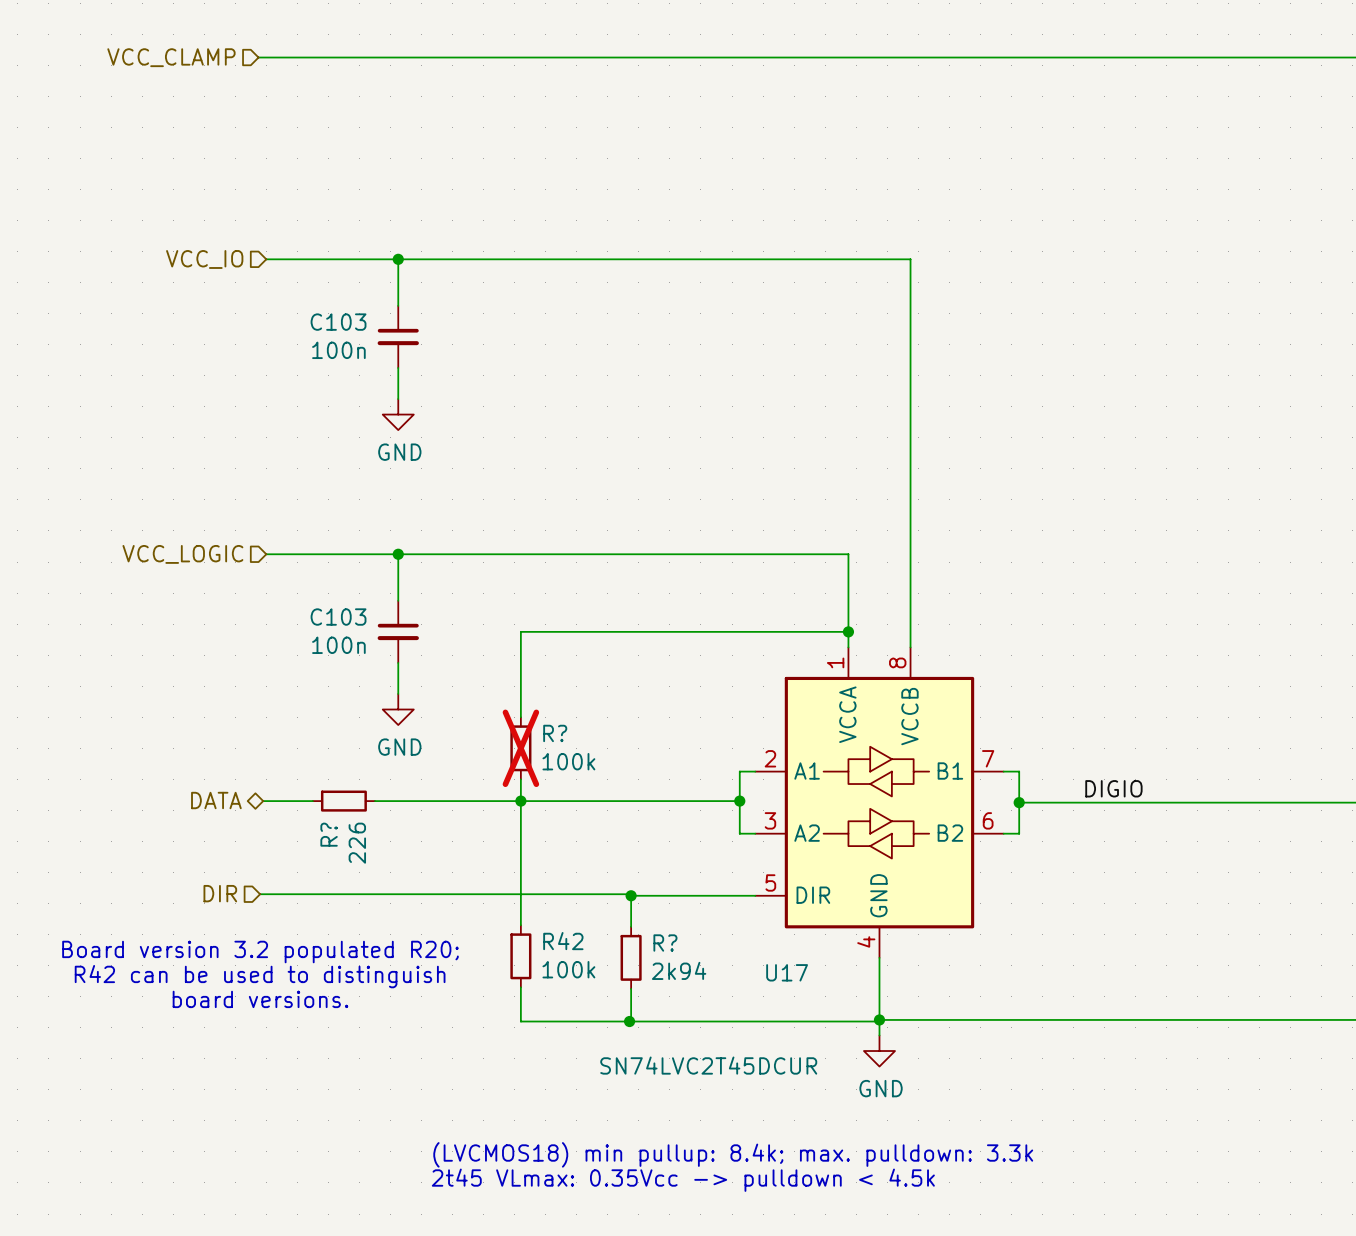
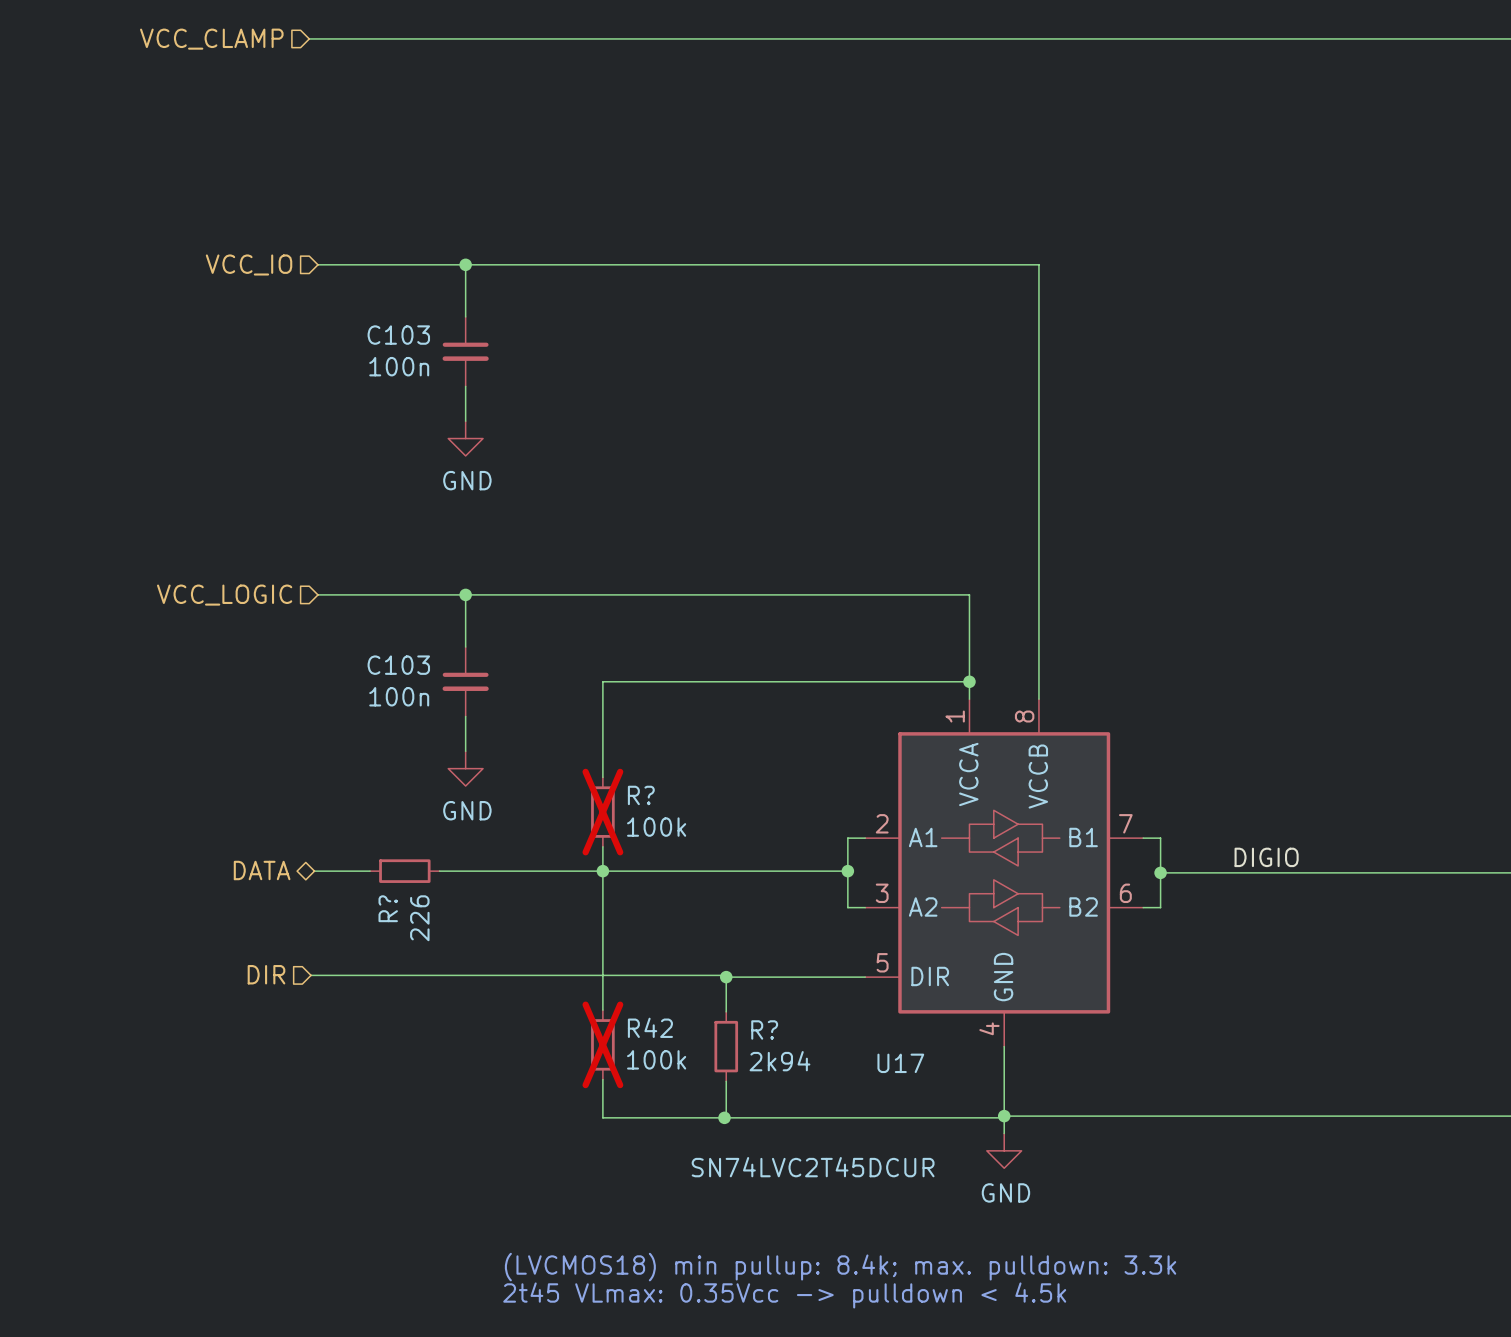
text: Board version 3.2 populated R20; (260, 952) -> none
R42 do-not-place cross: none -> (602, 1044)
text: R42 can be used to distinguish (260, 976) -> none
text: board versions. (260, 999) -> none

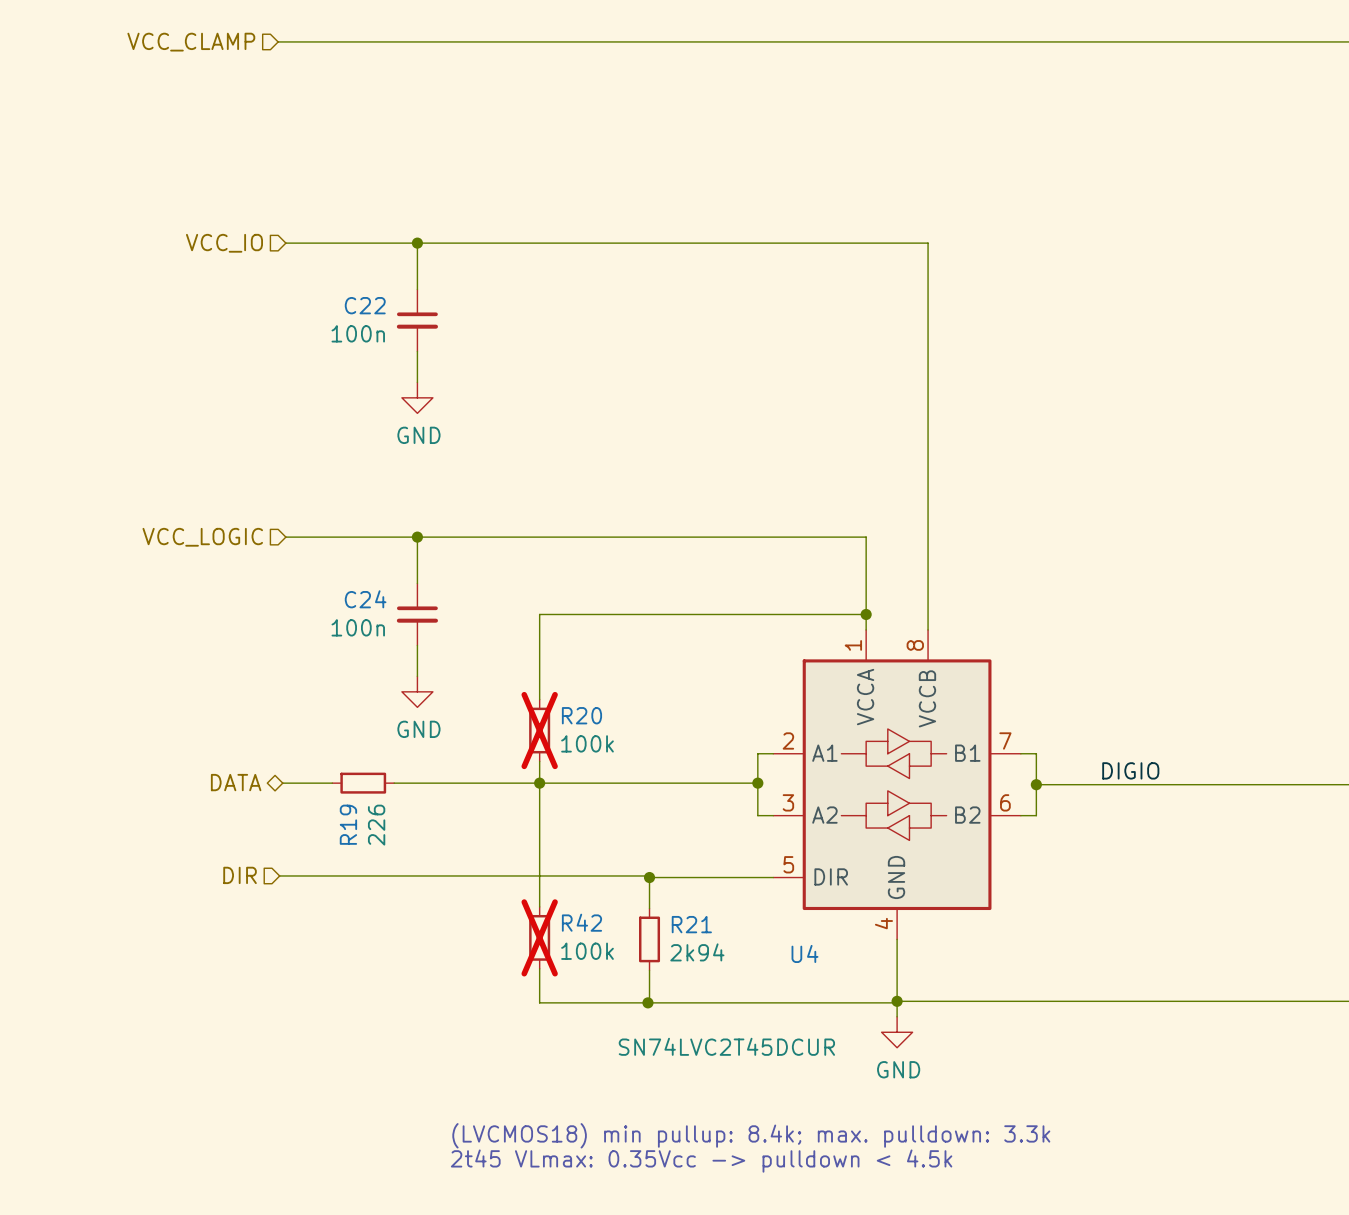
C103 name: C103 (398, 335) -> C22 (365, 305)
C103 name: C103 (398, 665) -> C24 (365, 599)
R? name: R? (641, 795) -> R20 (581, 715)
R? name: R? (388, 908) -> R19 (348, 824)
R? name: R? (764, 1029) -> R21 (691, 924)
U17 name: U17 (900, 1063) -> U4 (804, 953)

